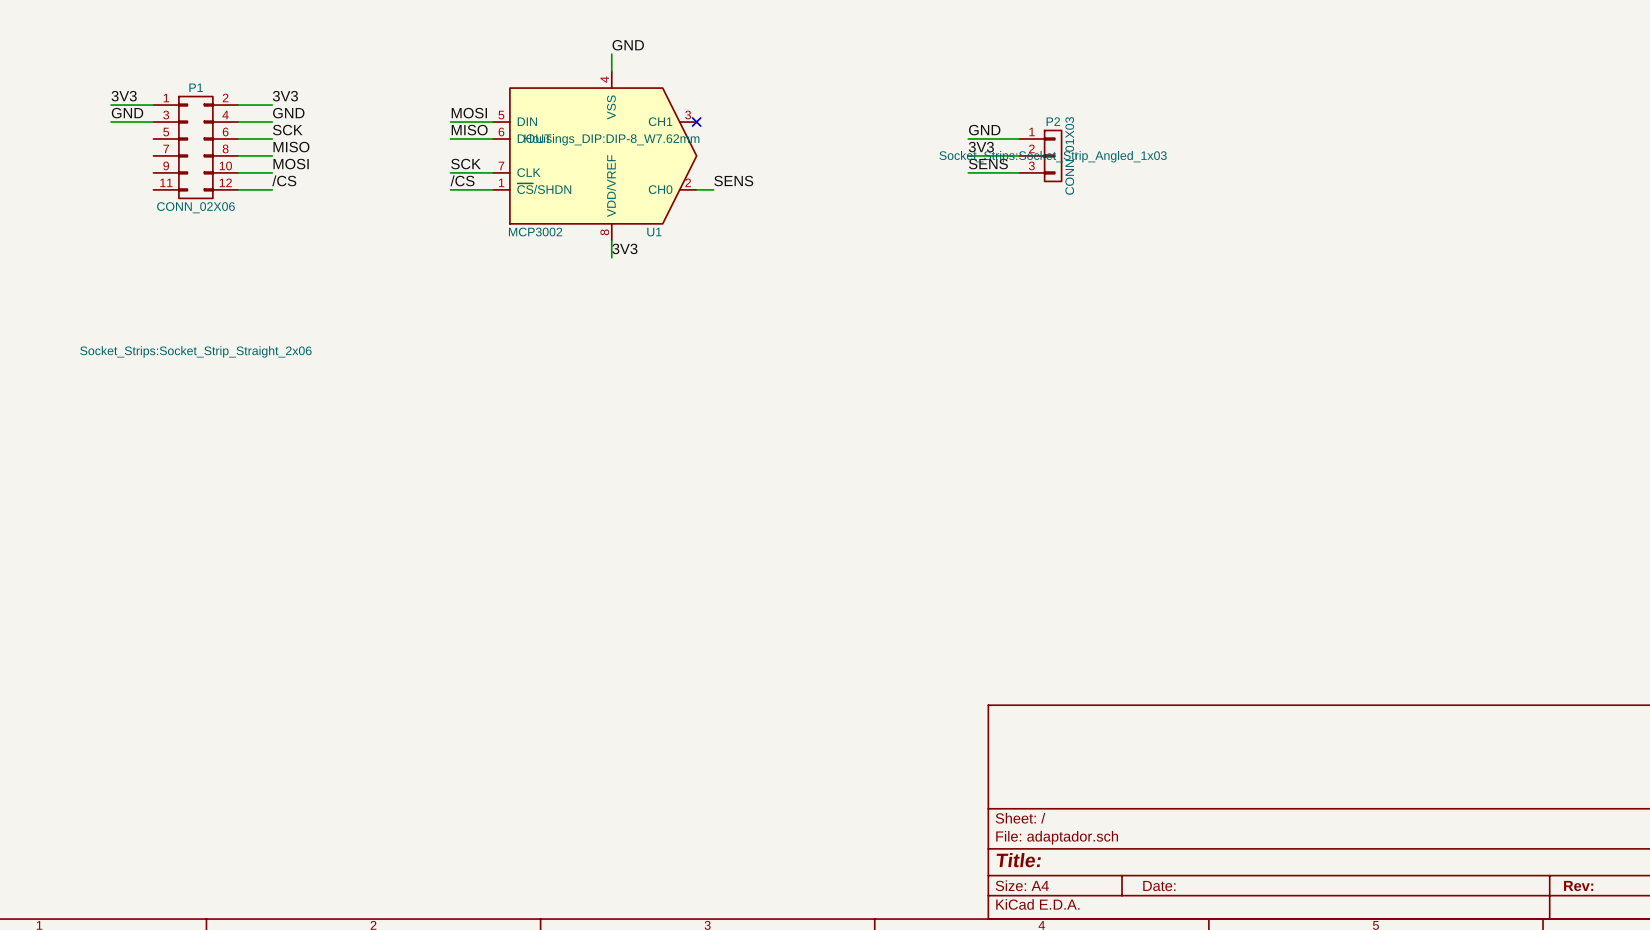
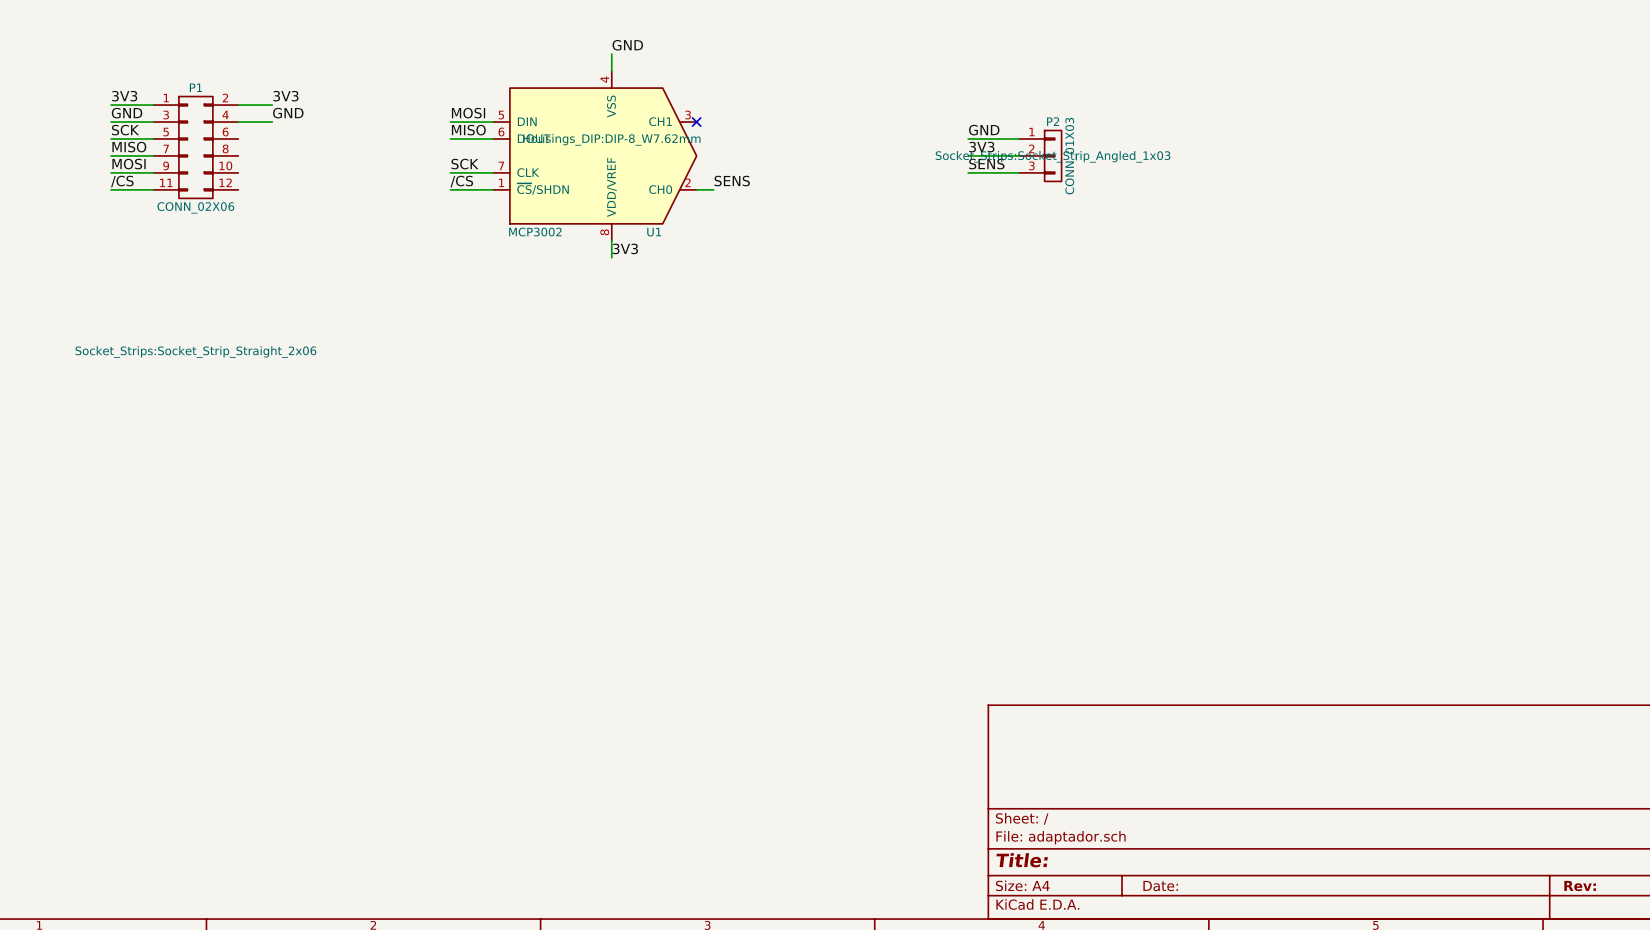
label position: SCK (287, 130) -> SCK (125, 130)
wire: none -> (111, 138) (153, 138)
wire: (238, 138) (272, 138) -> none
label position: MISO (291, 147) -> MISO (129, 147)
wire: none -> (111, 155) (153, 155)
wire: (238, 155) (272, 155) -> none
label position: MOSI (291, 164) -> MOSI (129, 164)
wire: none -> (111, 172) (153, 172)
wire: (238, 172) (272, 172) -> none
label position: /CS (284, 180) -> /CS (122, 181)
wire: none -> (111, 189) (153, 189)
wire: (238, 189) (272, 189) -> none

